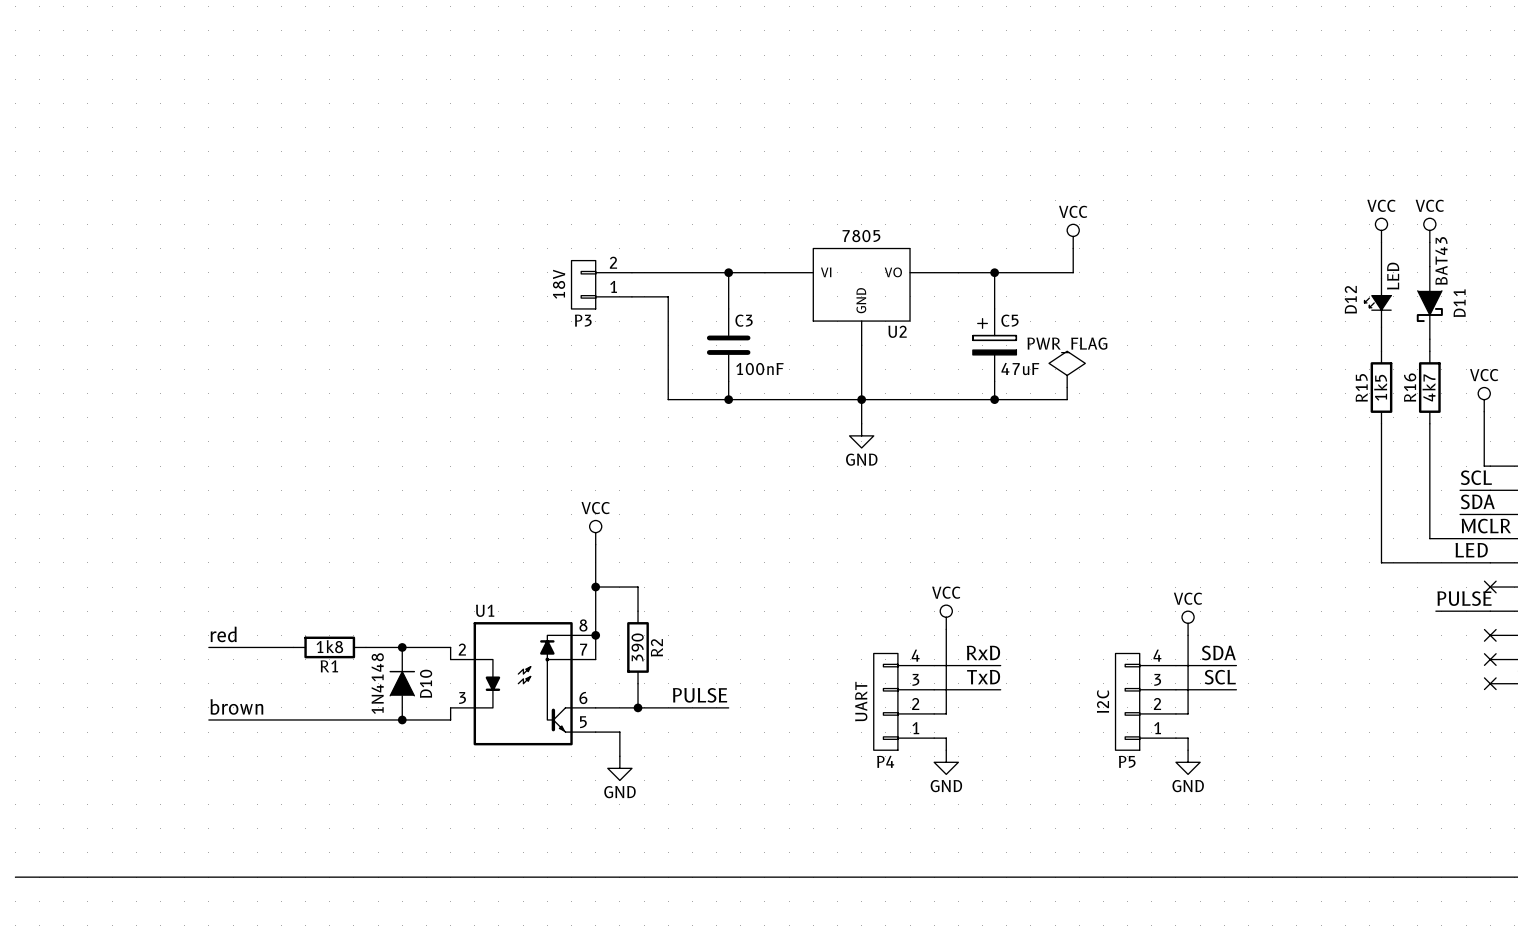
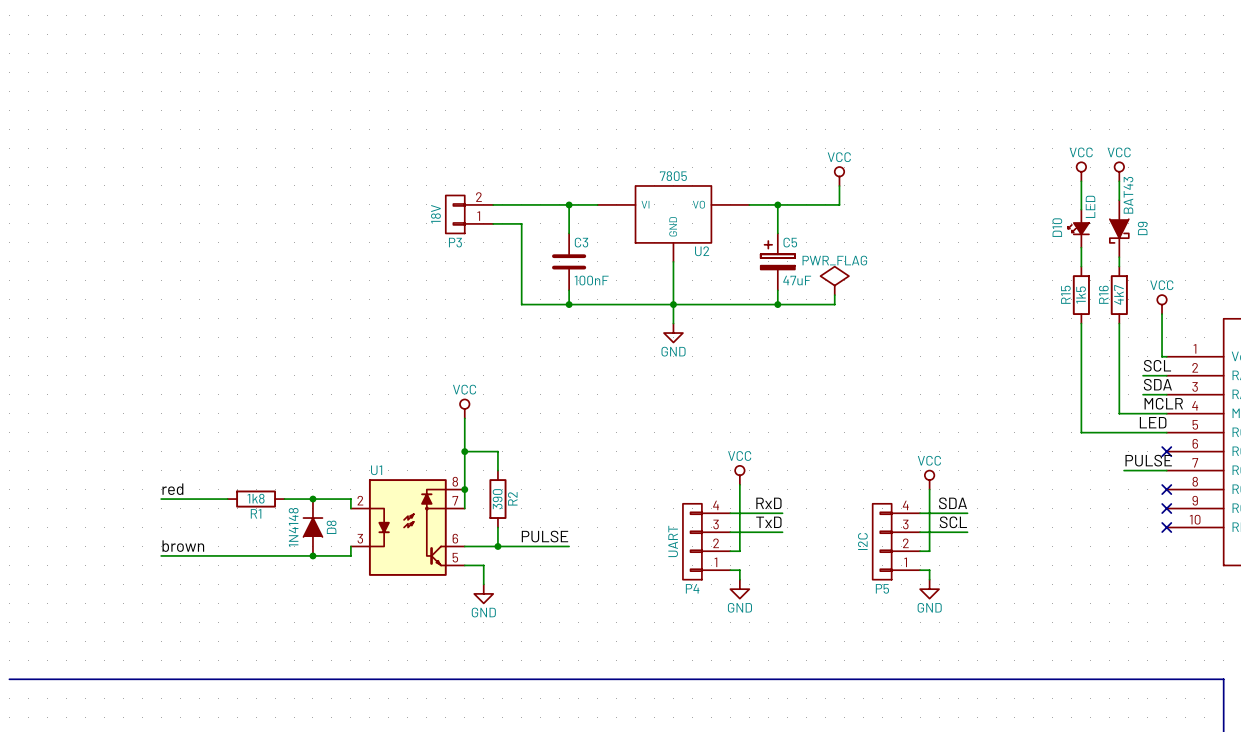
D12 name: D12 (1350, 299) -> D10 (1057, 227)
D11 name: D11 (1459, 303) -> D9 (1142, 228)
D10 name: D10 (426, 683) -> D8 (331, 527)

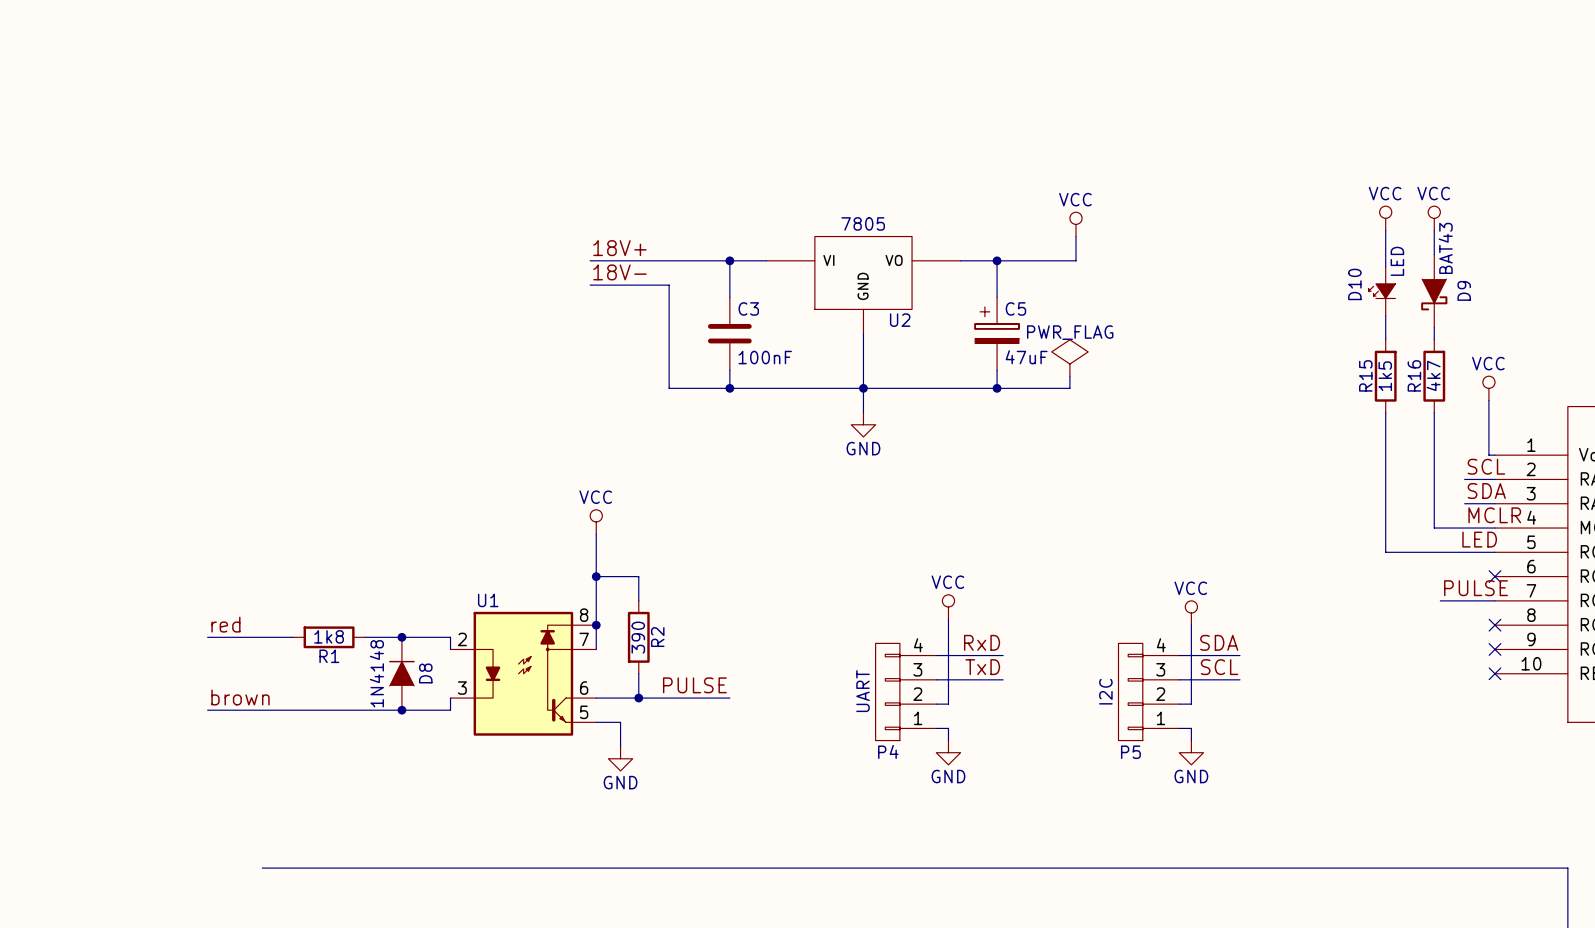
label: none -> 18V+ (619, 248)
label: none -> 18V- (619, 272)
P3: 18V (469, 214) -> none
bus: (9, 679) (203, 679) -> none

